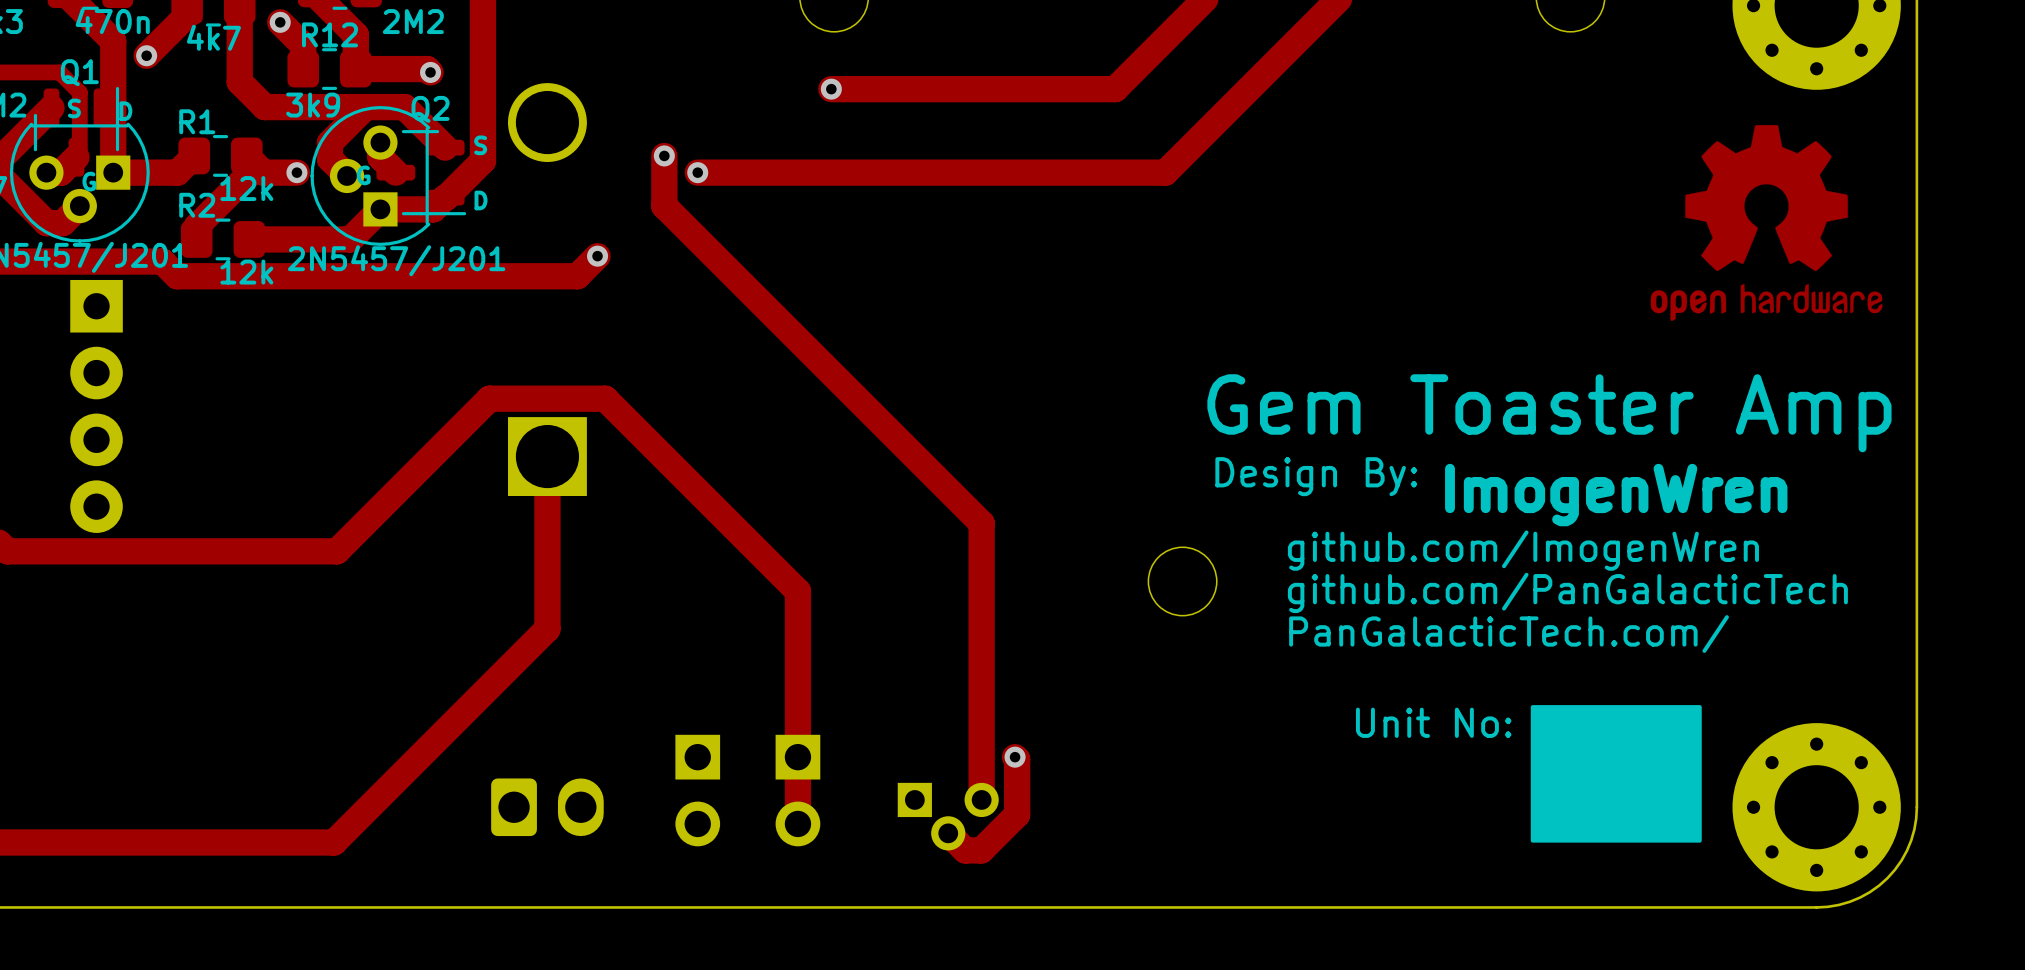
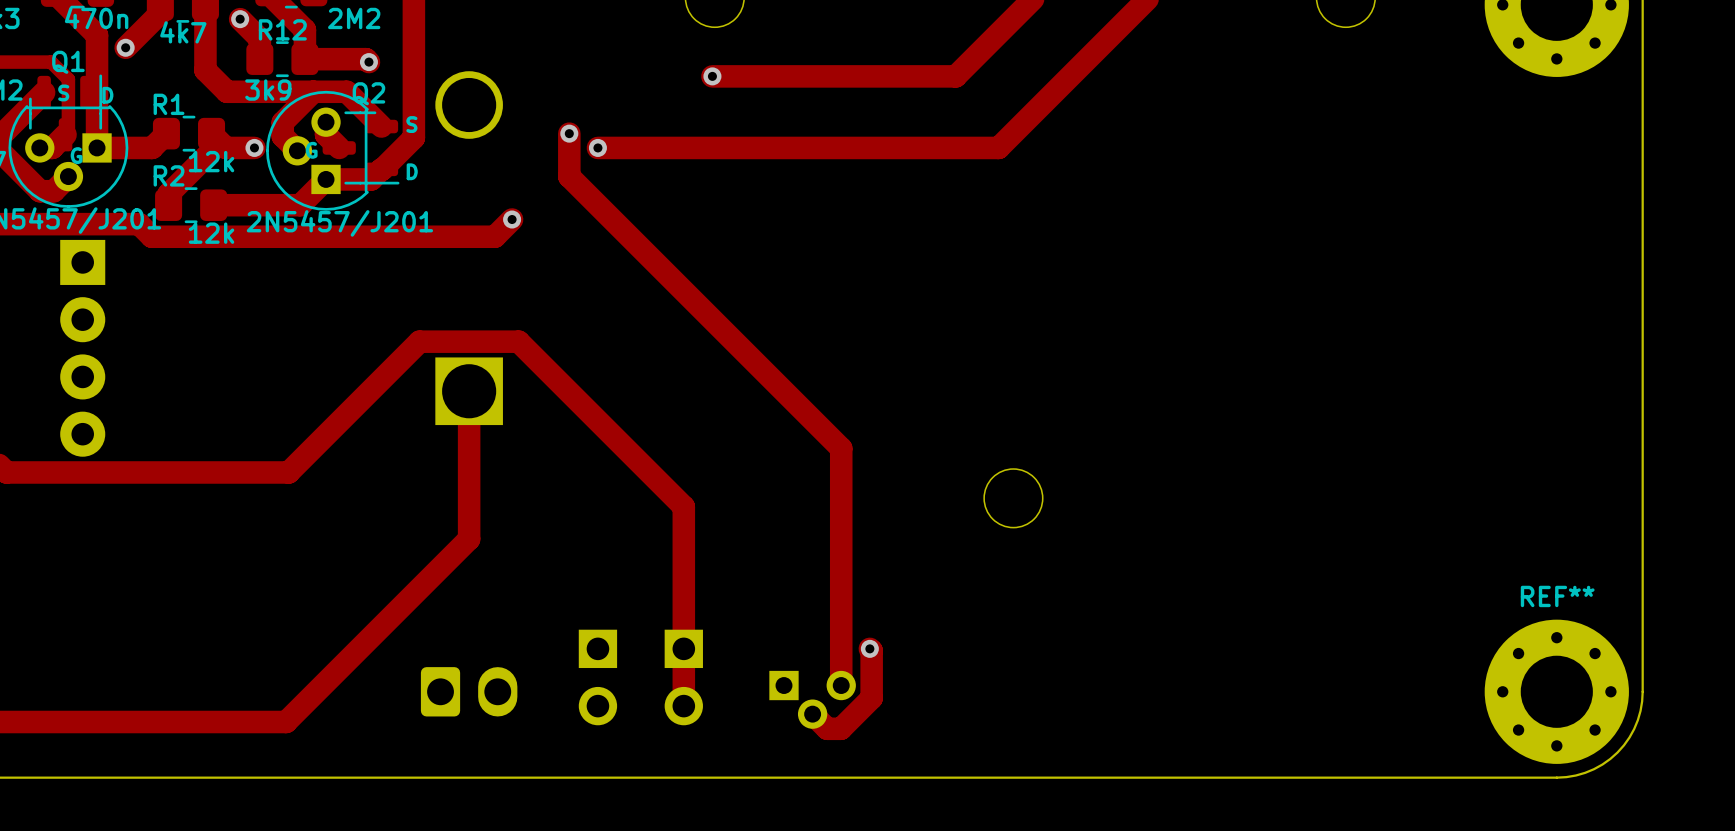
drawing: [1650, 124, 1883, 321] -> none
text: Gem Toaster Amp (1549, 413) -> none
text: Design By: (1316, 476) -> none
text: ImogenWren (1616, 495) -> none
text: github.com/ImogenWren (1523, 550) -> none
text: github.com/PanGalacticTech (1567, 592) -> none
text: PanGalacticTech.com/ (1509, 634) -> none
REF** name: none -> REF** (1557, 596)
drawing: [1530, 705, 1702, 843] -> none
text: Unit No: (1433, 722) -> none

